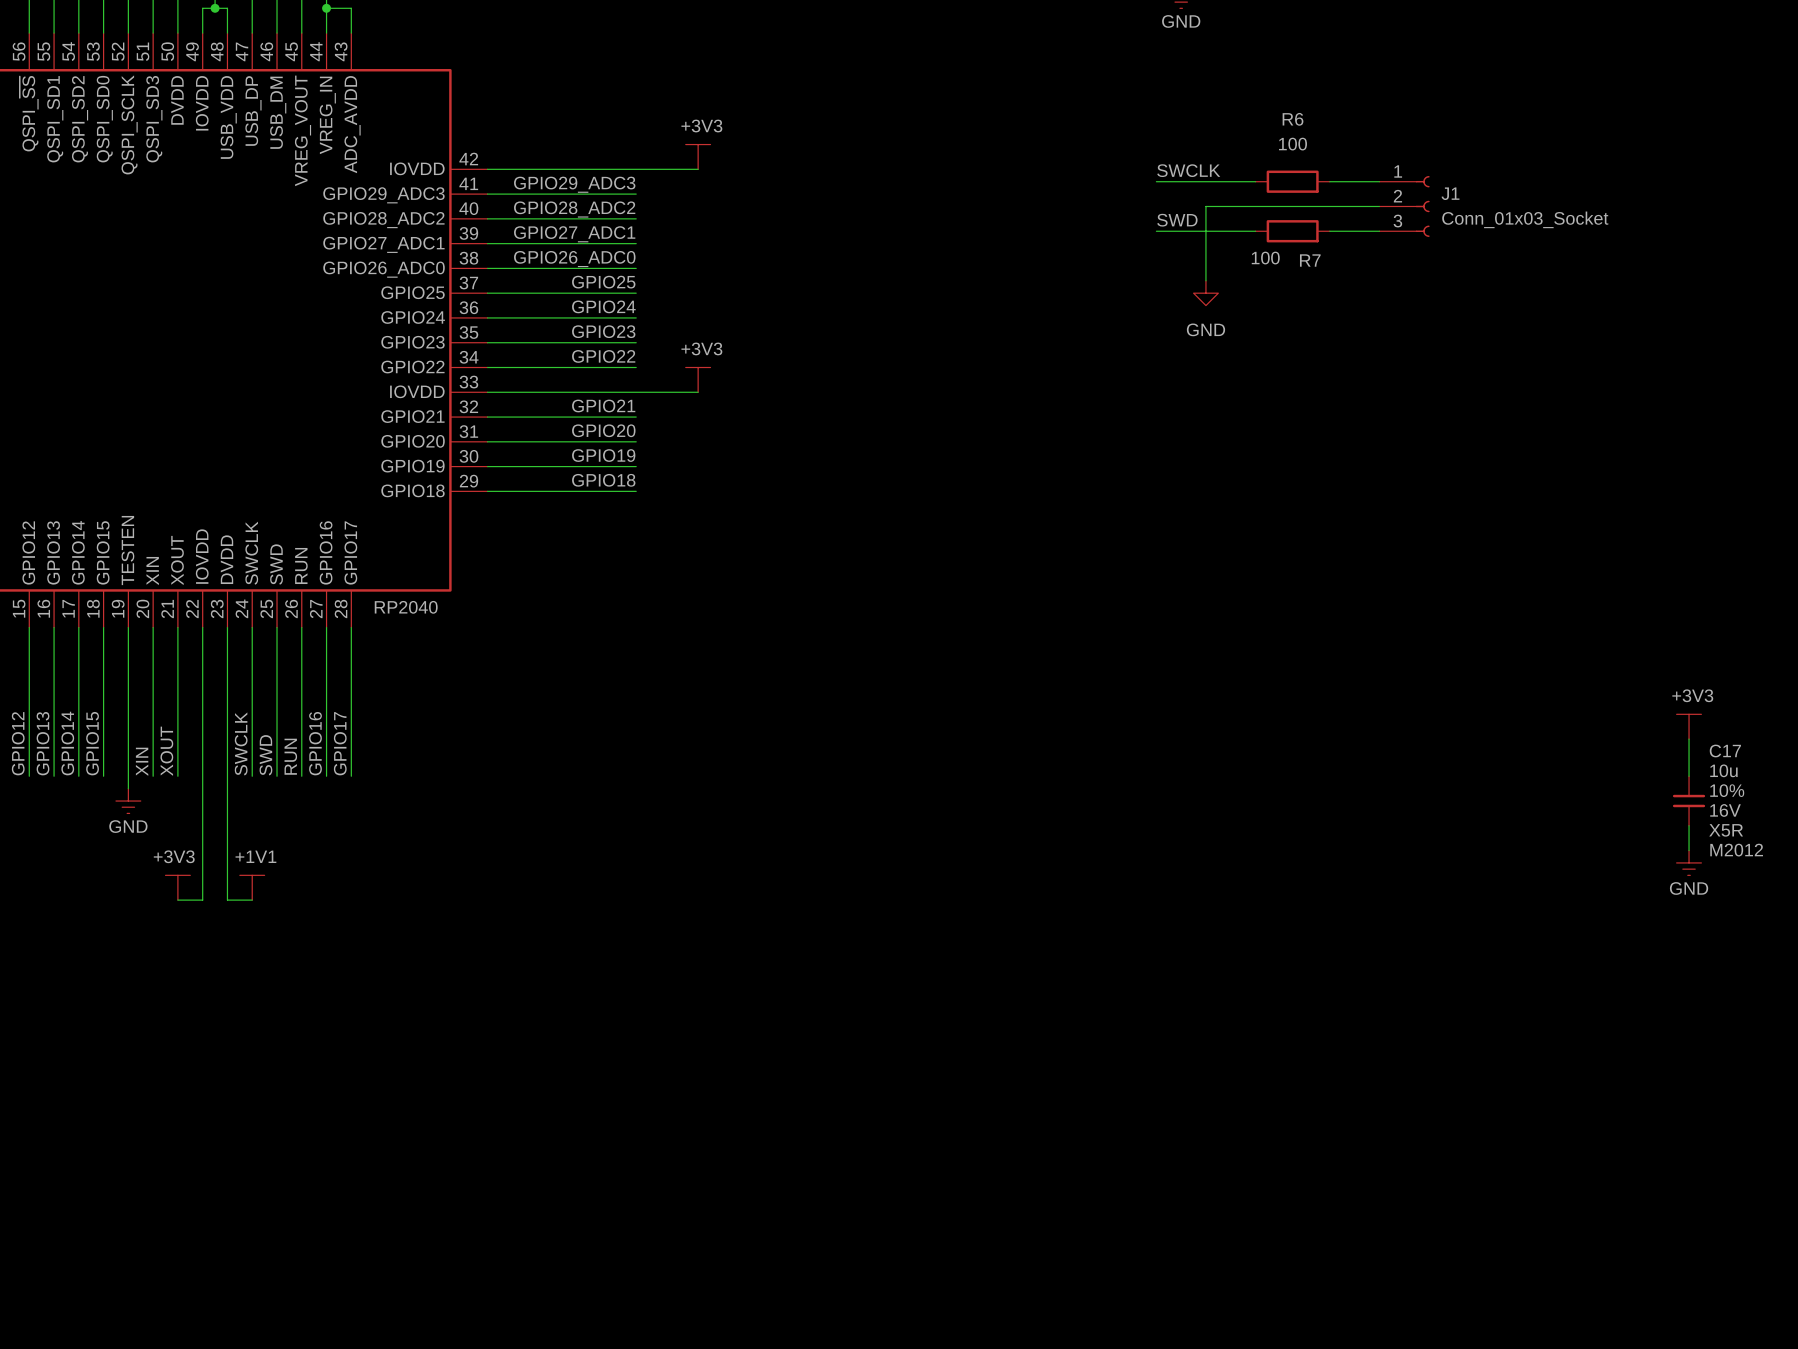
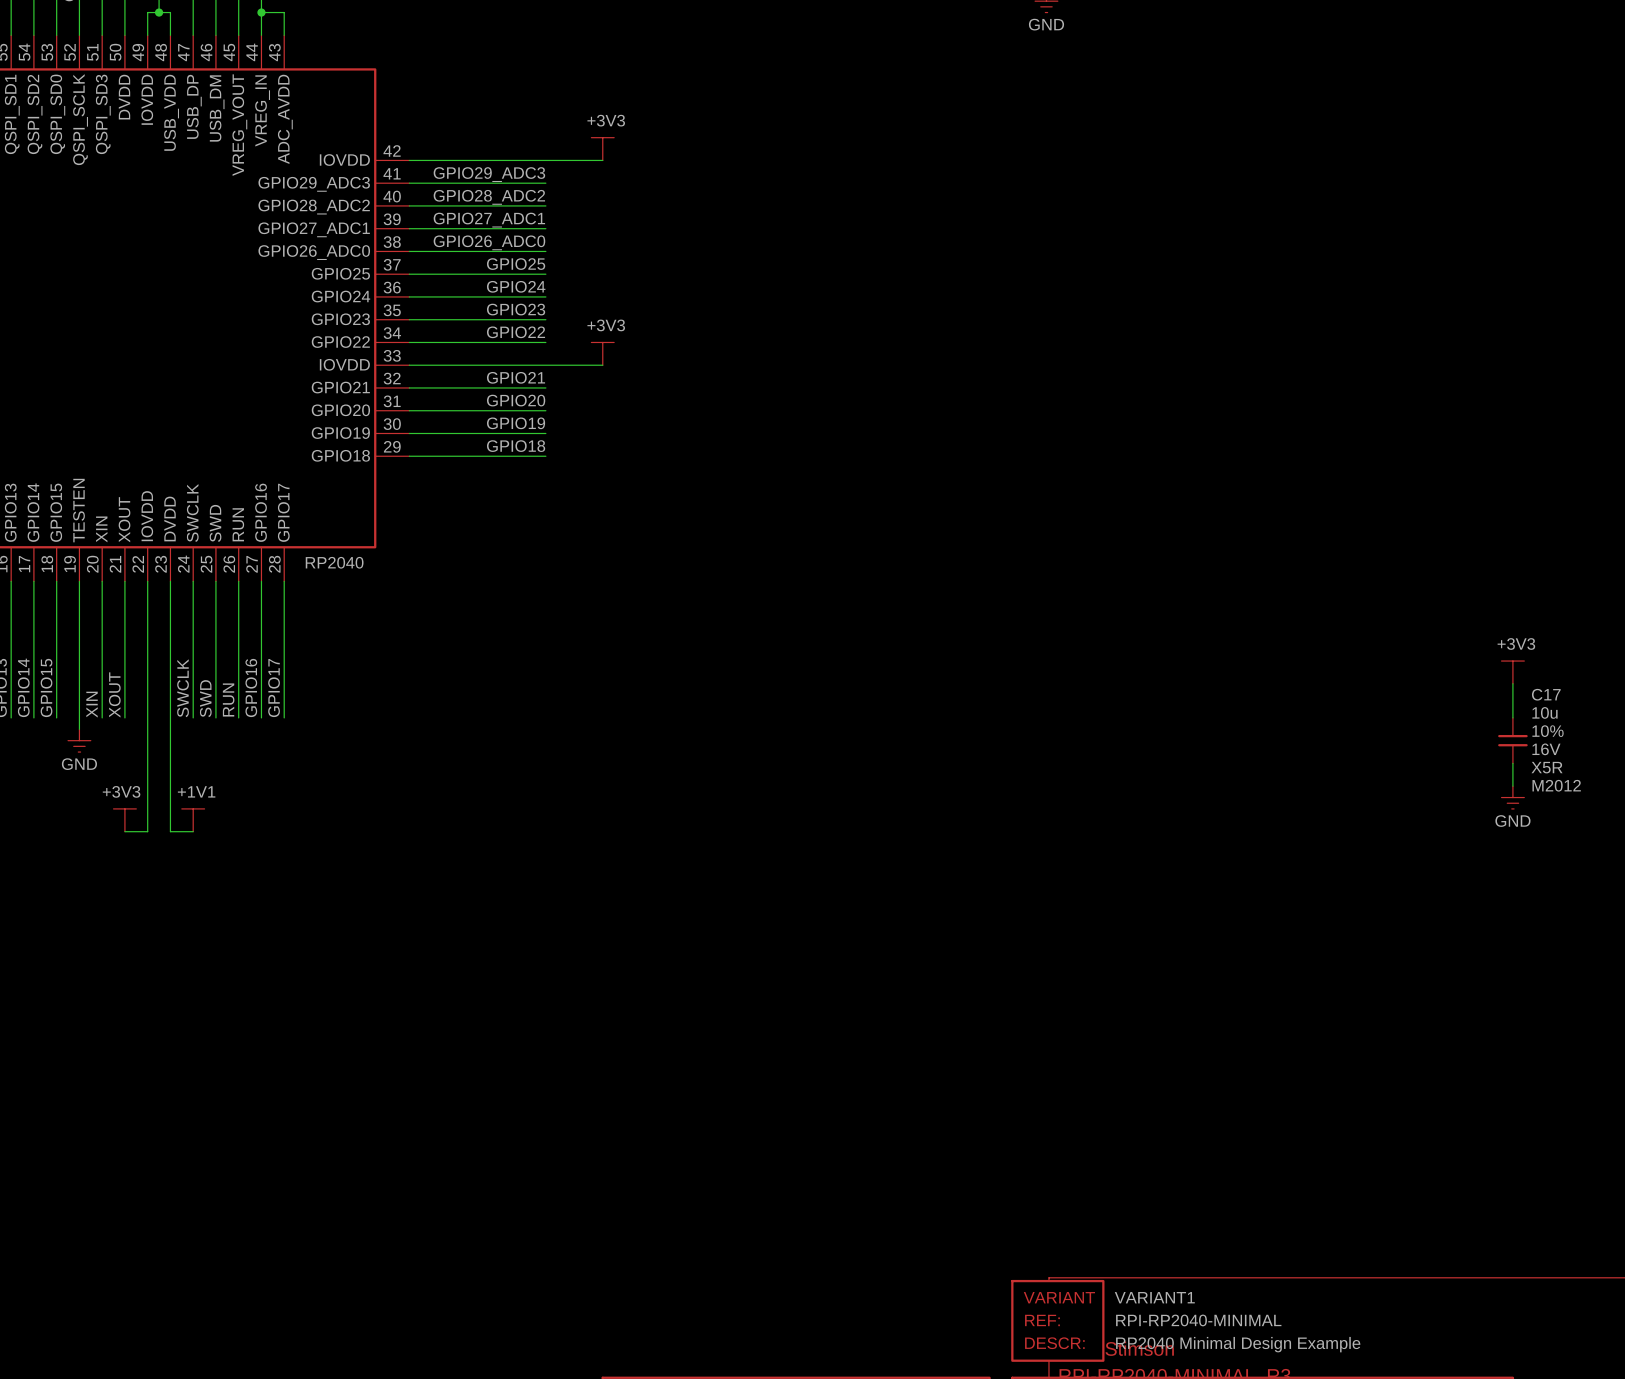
label: SWCLK (1188, 170) -> none
wire: (1156, 181) (1255, 181) -> none
R6: 100 (1292, 181) -> none
wire: (1329, 181) (1379, 181) -> none
wire: (1379, 206) (1205, 206) (1205, 280) -> none
J1: Conn_01x03_Socket (1404, 206) -> none
label: SWD (1177, 220) -> none
wire: (1156, 231) (1255, 231) -> none
R7: 100 (1292, 231) -> none
wire: (1329, 231) (1379, 231) -> none
power symbol: GND (1205, 293) -> none

